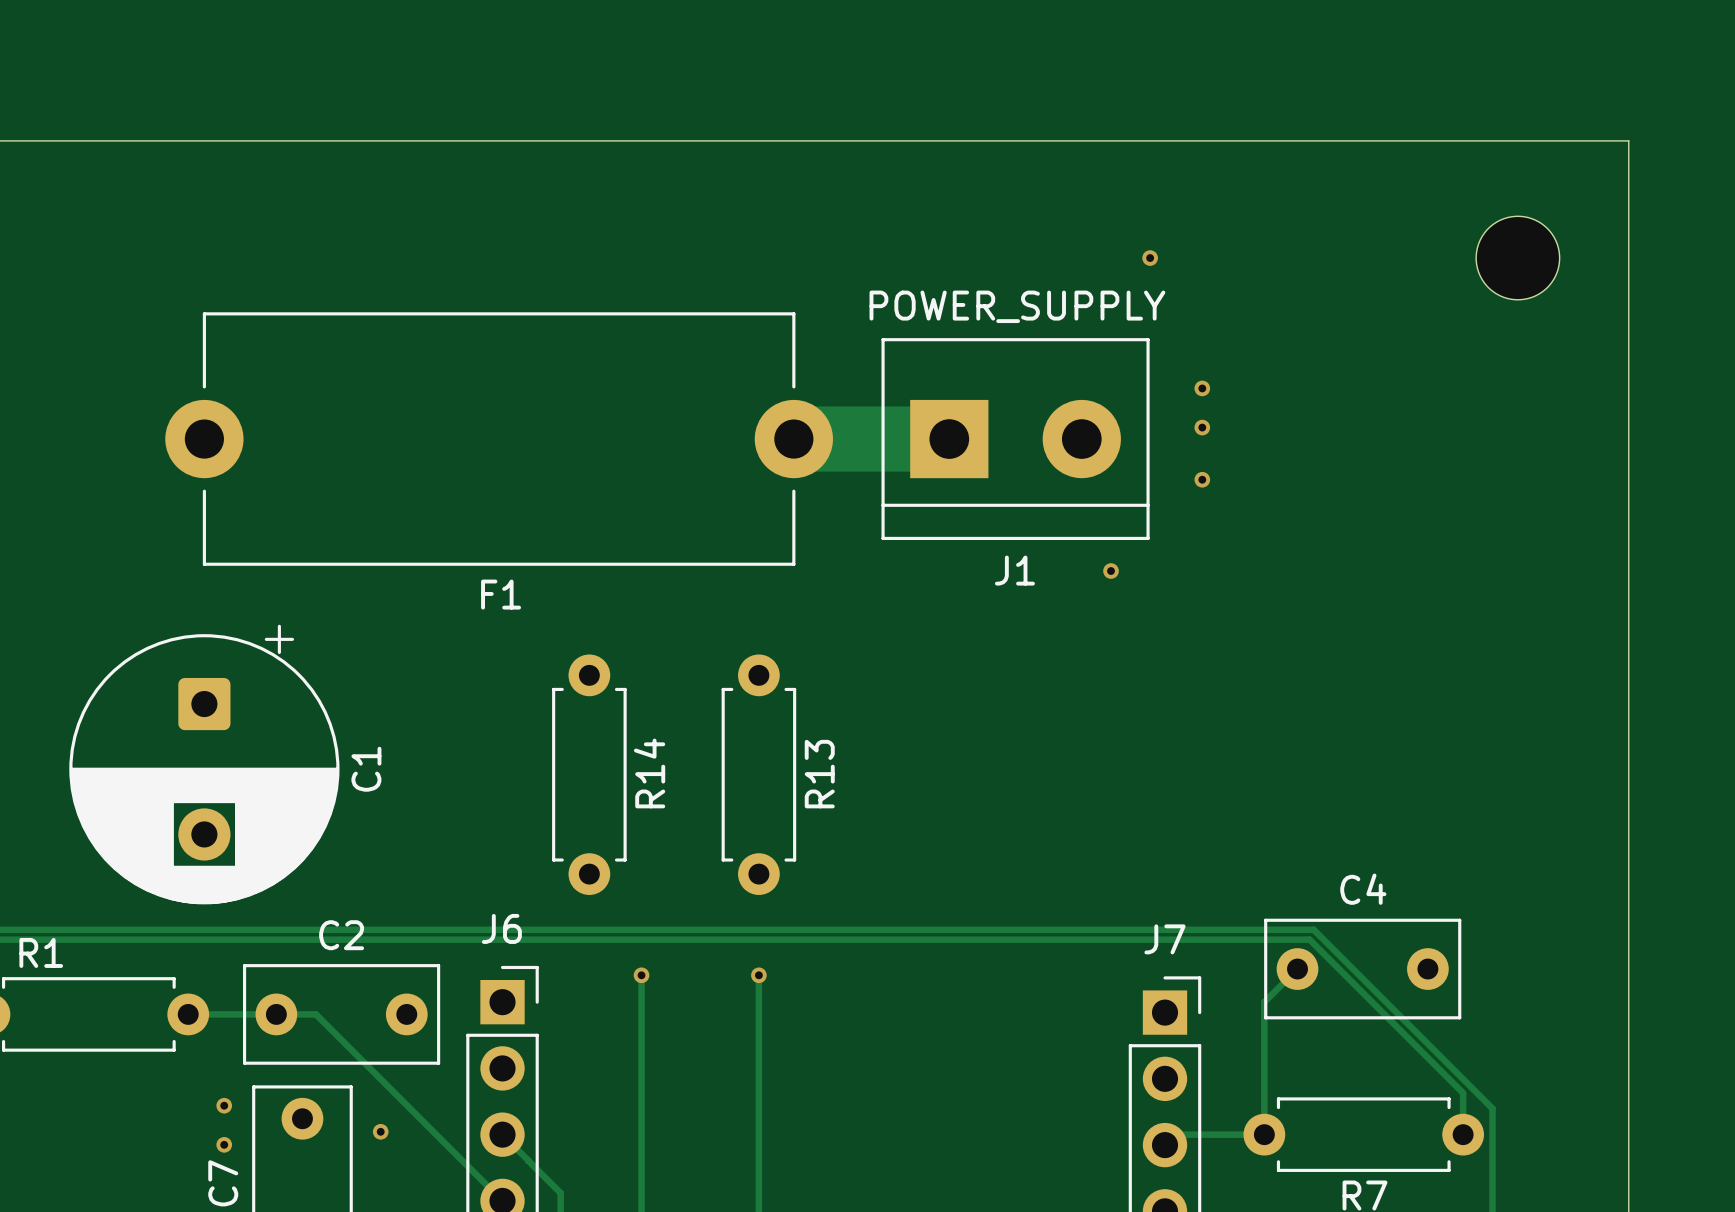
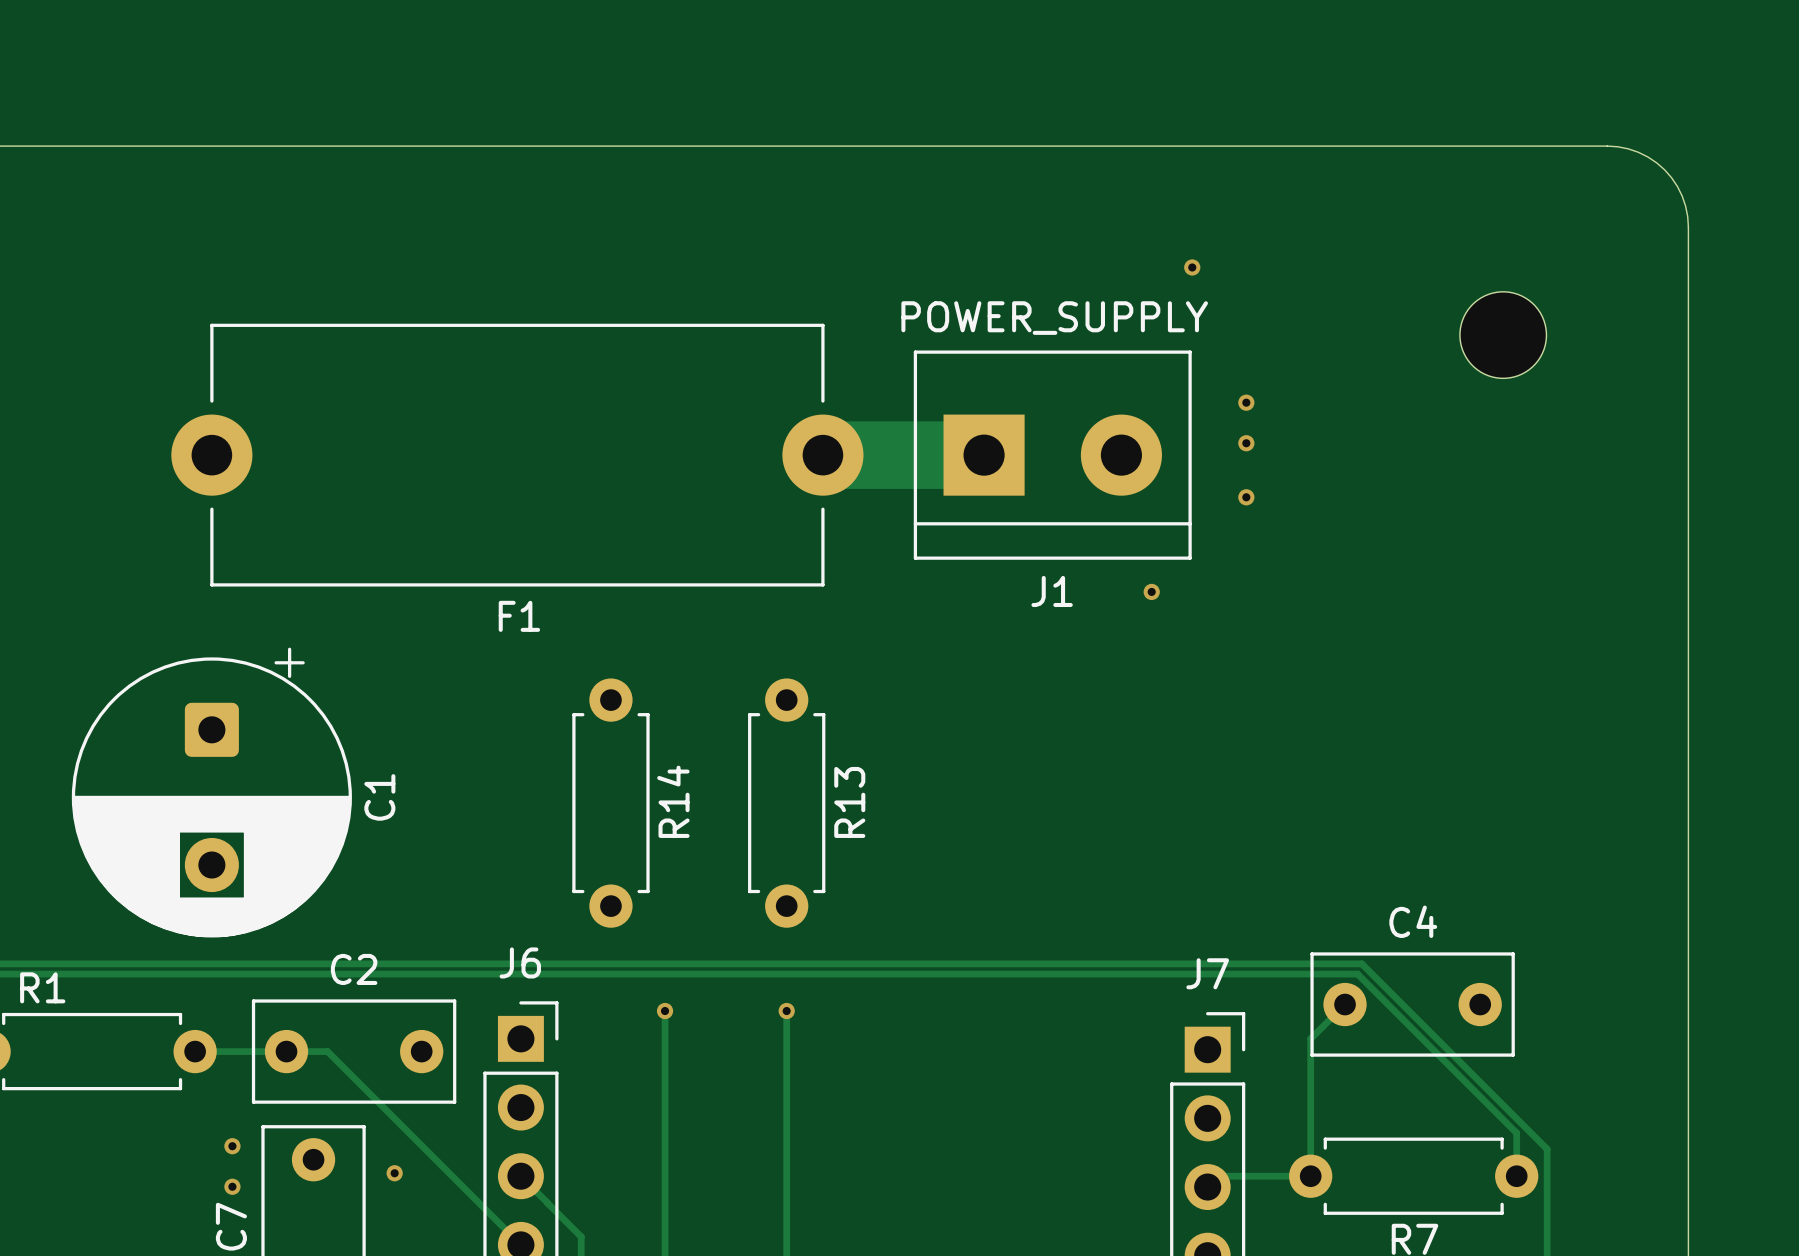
board edge: (1550, 140) (1628, 140) (1628, 219) -> (1607, 146) (1638, 152) (1664, 169) (1682, 196) (1688, 227)
part position: (1517, 258) -> (1503, 335)

